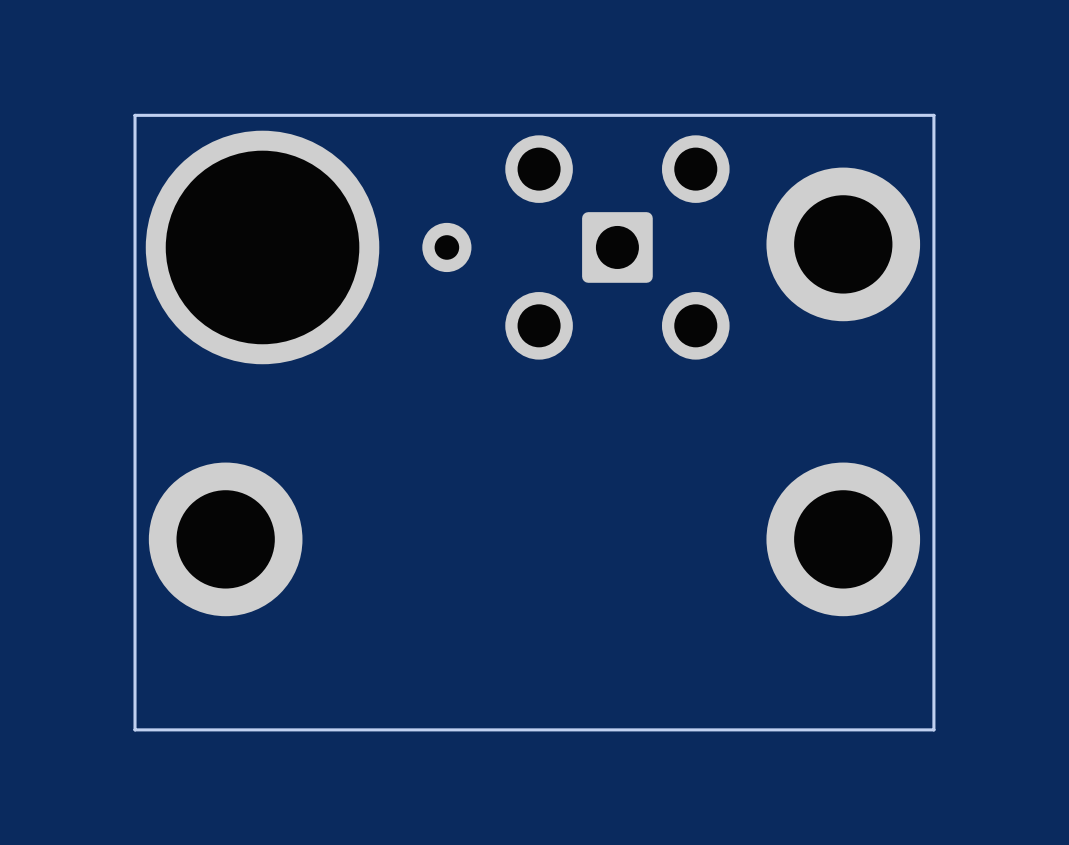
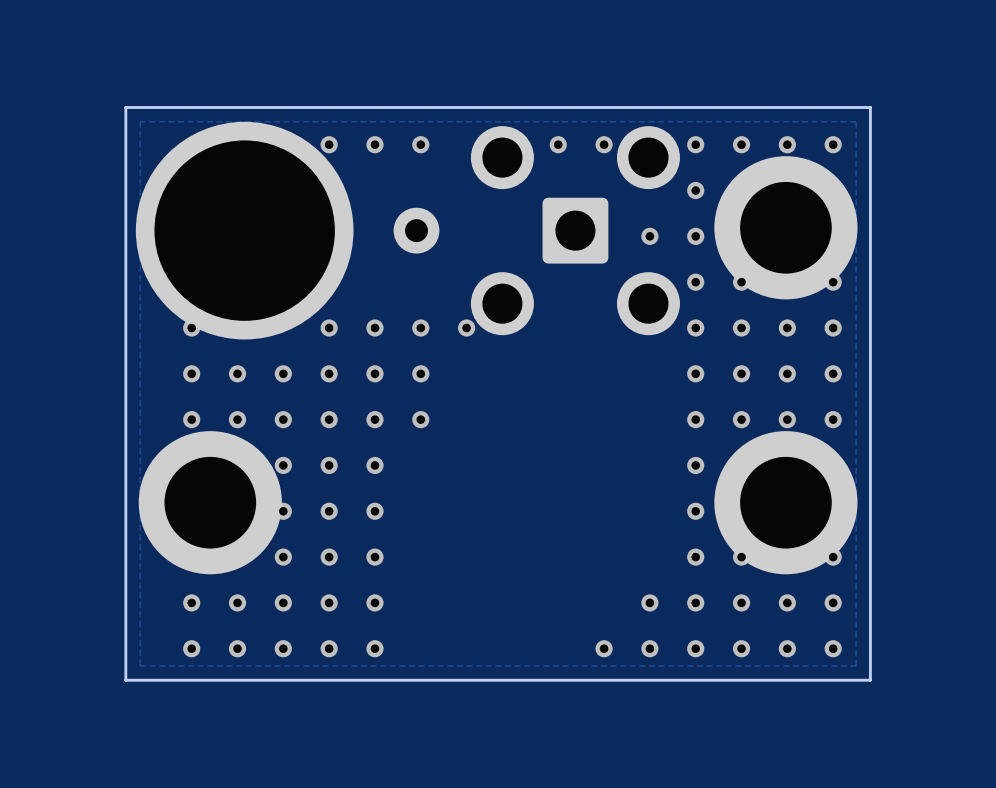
zone outline: none -> (856, 121) (140, 121) (140, 665) (856, 665) (856, 121)
via: none -> (329, 144)
via: none -> (374, 144)
via: none -> (420, 144)
via: none -> (558, 144)
via: none -> (604, 144)
via: none -> (695, 144)
via: none -> (741, 144)
via: none -> (787, 144)
via: none -> (833, 144)
via: none -> (695, 190)
via: none -> (649, 236)
via: none -> (695, 236)
via: none -> (695, 282)
via: none -> (741, 282)
via: none -> (833, 282)
via: none -> (191, 327)
via: none -> (329, 327)
via: none -> (374, 327)
via: none -> (420, 327)
via: none -> (466, 327)
via: none -> (695, 327)
via: none -> (741, 327)
via: none -> (787, 327)
via: none -> (833, 327)
via: none -> (191, 373)
via: none -> (237, 373)
via: none -> (283, 373)
via: none -> (329, 373)
via: none -> (374, 373)
via: none -> (420, 373)
via: none -> (695, 373)
via: none -> (741, 373)
via: none -> (787, 373)
via: none -> (833, 373)
via: none -> (191, 419)
via: none -> (237, 419)
via: none -> (283, 419)
via: none -> (329, 419)
via: none -> (374, 419)
via: none -> (420, 419)
via: none -> (695, 419)
via: none -> (741, 419)
via: none -> (787, 419)
via: none -> (833, 419)
via: none -> (283, 465)
via: none -> (329, 465)
via: none -> (374, 465)
via: none -> (695, 465)
via: none -> (283, 511)
via: none -> (329, 511)
via: none -> (374, 511)
via: none -> (695, 511)
via: none -> (283, 557)
via: none -> (329, 557)
via: none -> (374, 557)
via: none -> (695, 557)
via: none -> (741, 557)
via: none -> (833, 557)
via: none -> (191, 602)
via: none -> (237, 602)
via: none -> (283, 602)
via: none -> (329, 602)
via: none -> (374, 602)
via: none -> (649, 602)
via: none -> (695, 602)
via: none -> (741, 602)
via: none -> (787, 602)
via: none -> (833, 602)
via: none -> (191, 648)
via: none -> (237, 648)
via: none -> (283, 648)
via: none -> (329, 648)
via: none -> (374, 648)
via: none -> (604, 648)
via: none -> (649, 648)
via: none -> (695, 648)
via: none -> (741, 648)
via: none -> (787, 648)
via: none -> (833, 648)

